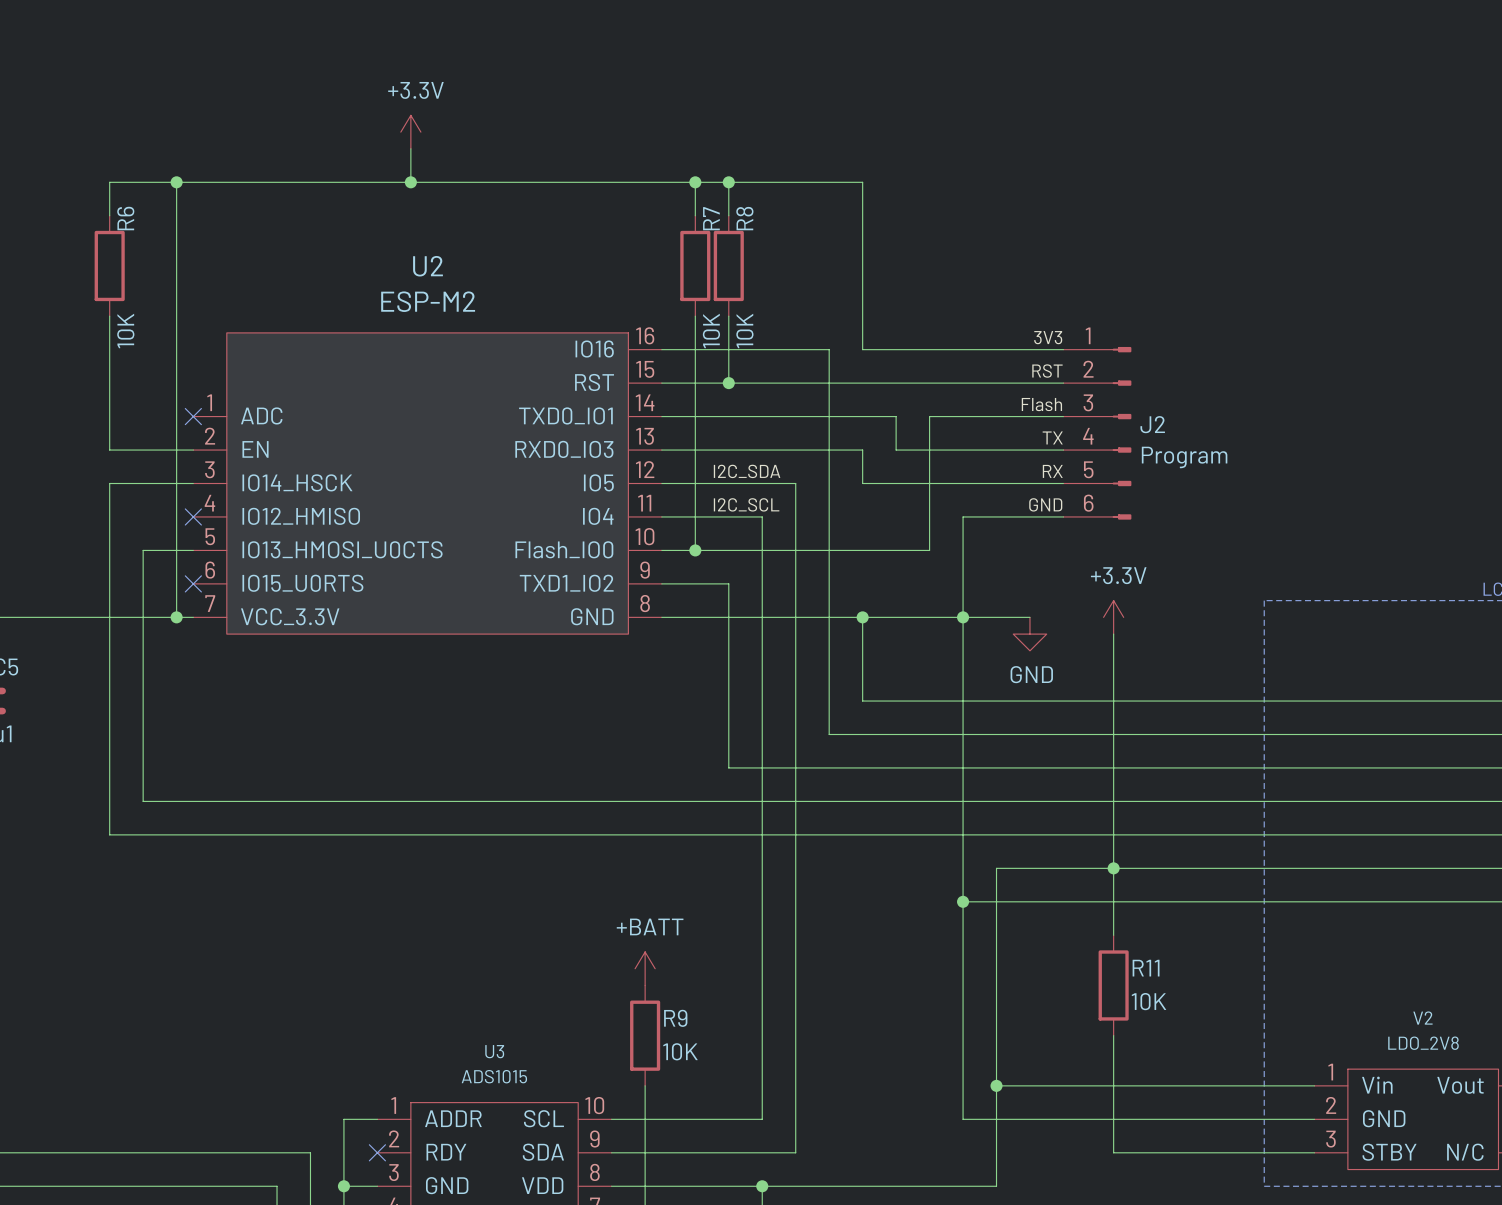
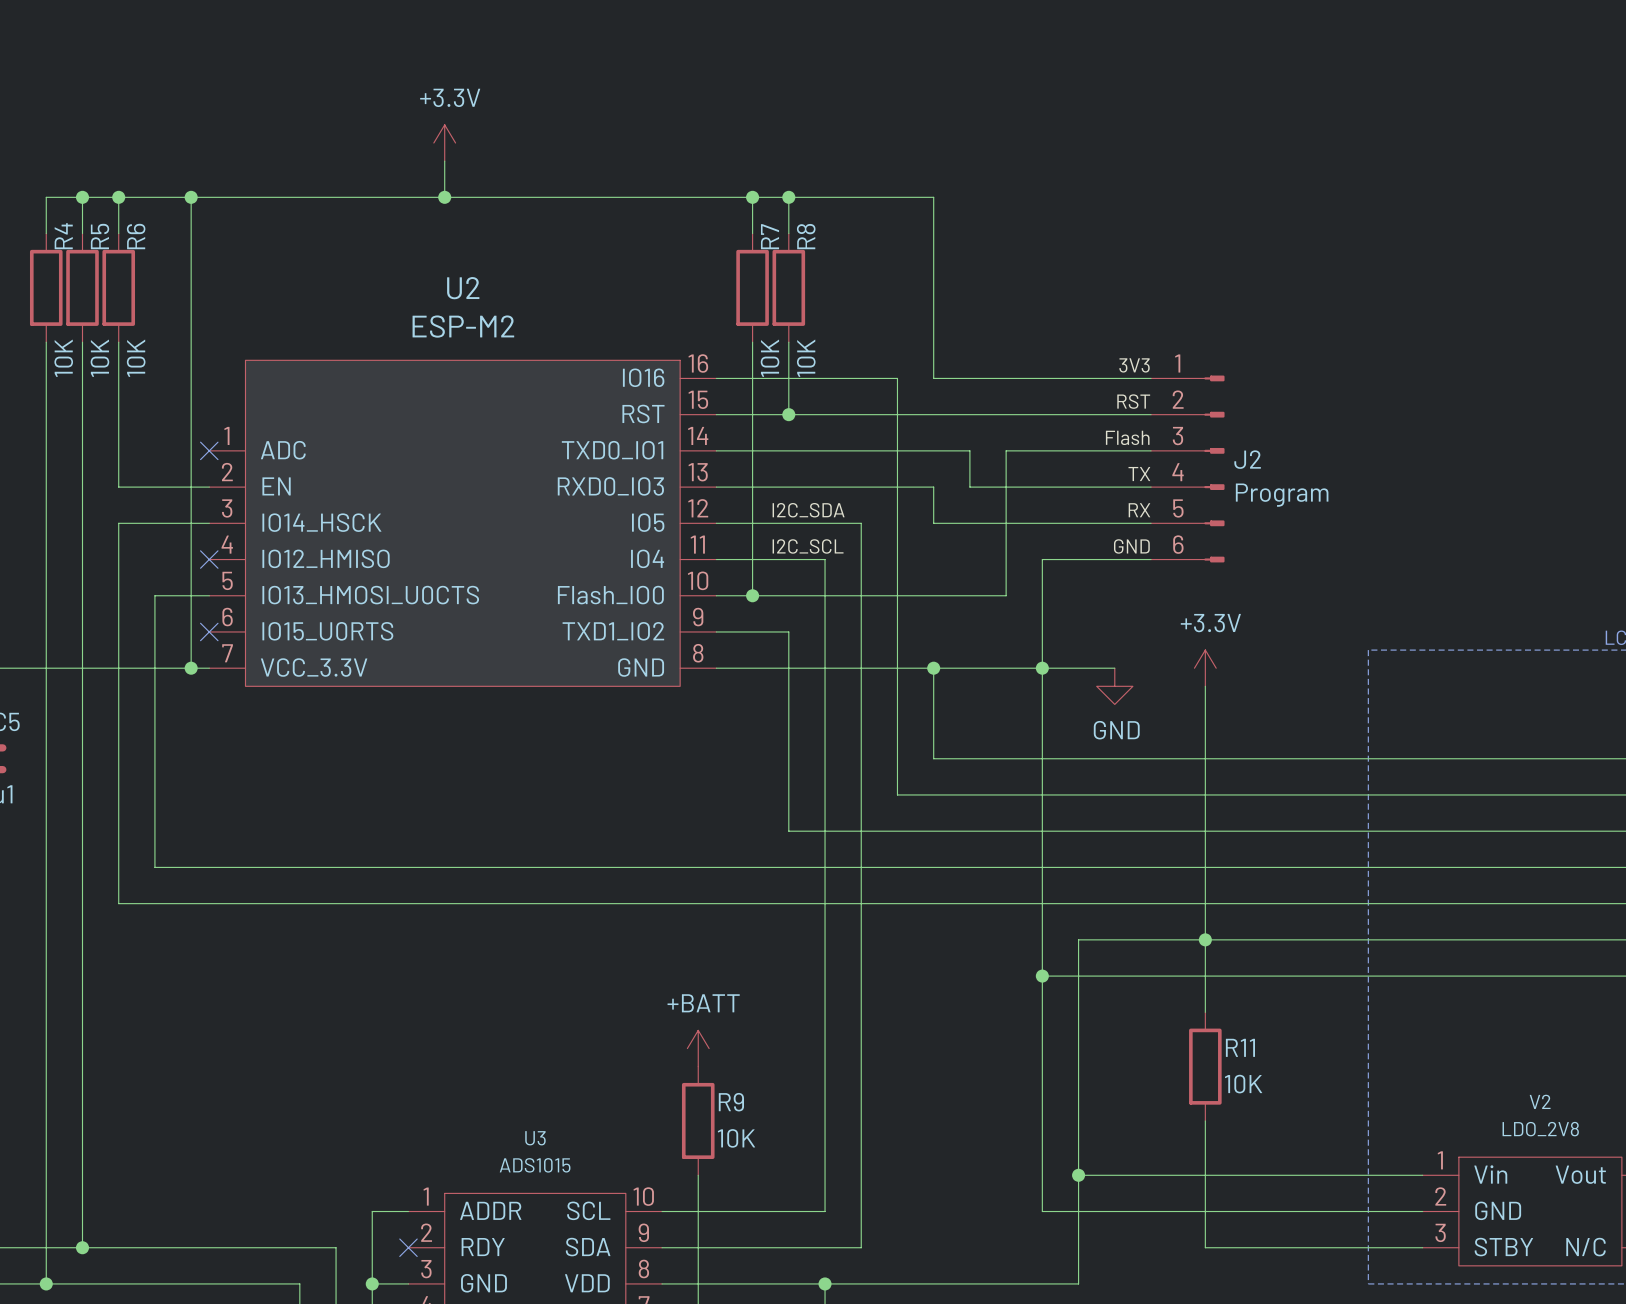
wire: none -> (82, 197) (82, 233)
junction: none -> (82, 197)
wire: none -> (118, 197) (46, 197) (46, 233)
junction: none -> (118, 197)
R4: none -> 10K (46, 287)
R5: none -> 10K (82, 287)
wire: none -> (46, 342) (46, 1283)
wire: none -> (82, 342) (82, 1247)
junction: none -> (82, 1247)
junction: none -> (46, 1283)

